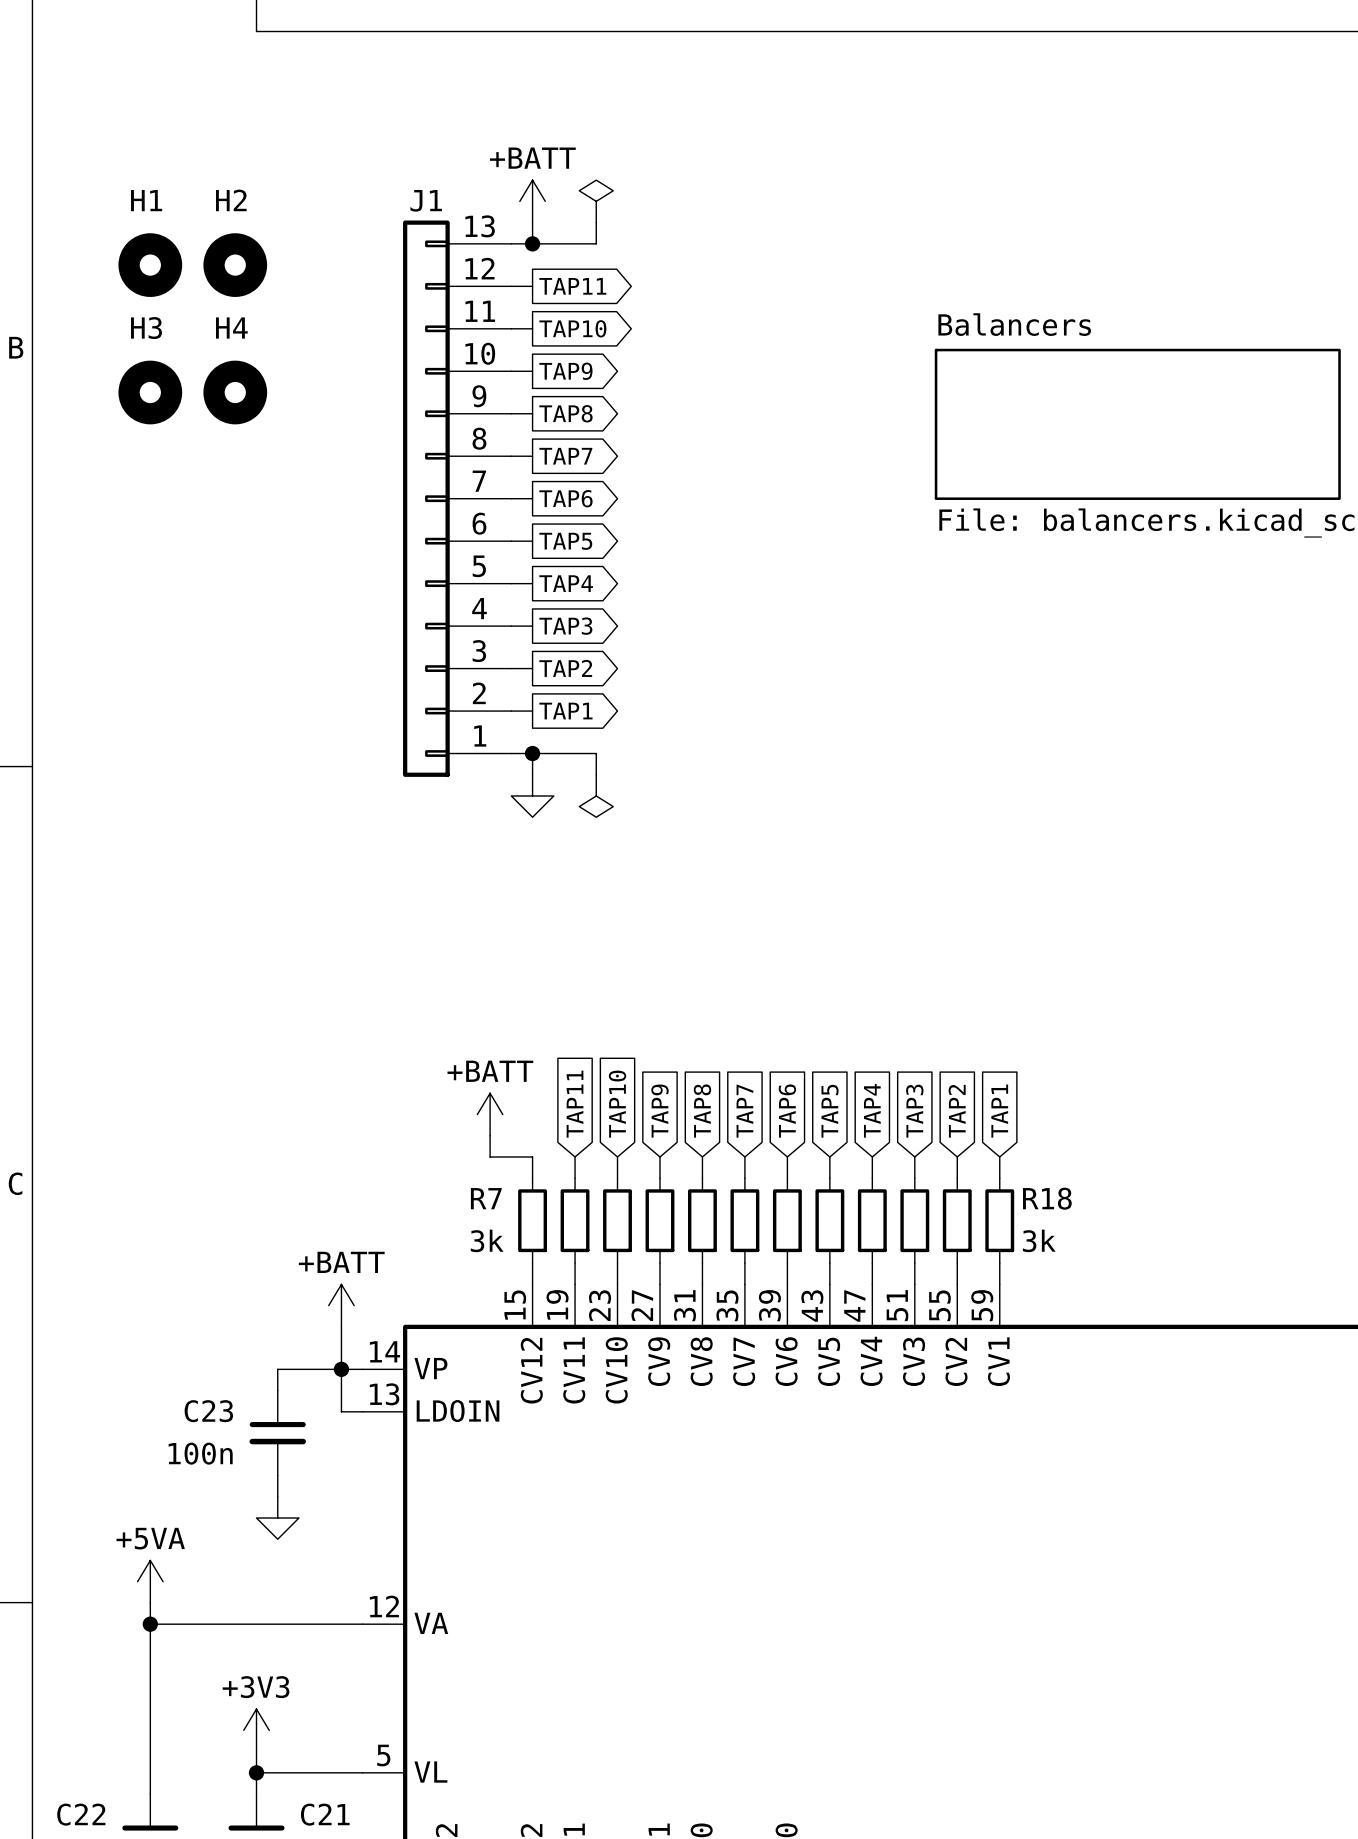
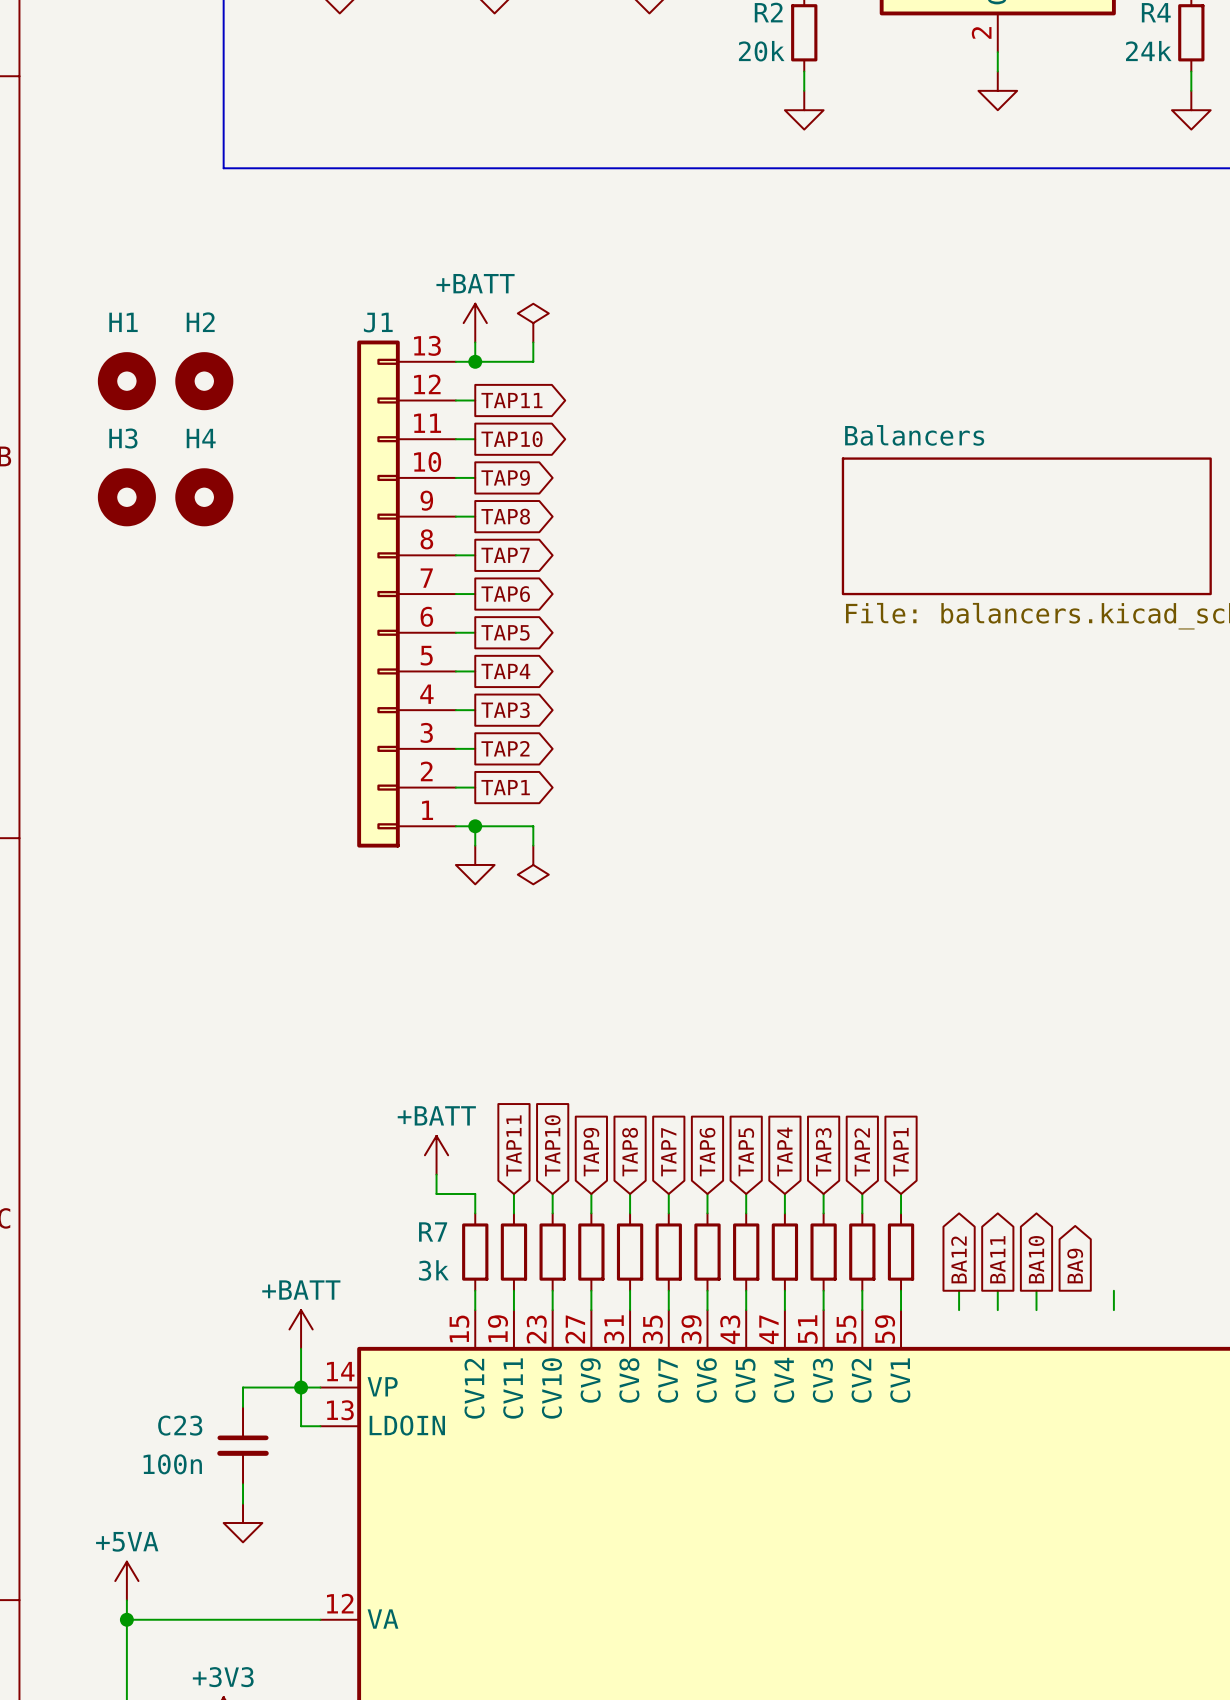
R18 name: R18 (1047, 1198) -> none
global label: none -> BA12 (958, 1259)
global label: none -> BA11 (997, 1259)
global label: none -> BA10 (1036, 1259)
global label: none -> BA9 (1075, 1266)
R18 value: 3k (1039, 1240) -> none
wire: none -> (959, 1290) (959, 1310)
wire: none -> (997, 1290) (997, 1310)
wire: none -> (1036, 1290) (1036, 1310)
wire: none -> (1113, 1290) (1113, 1310)

